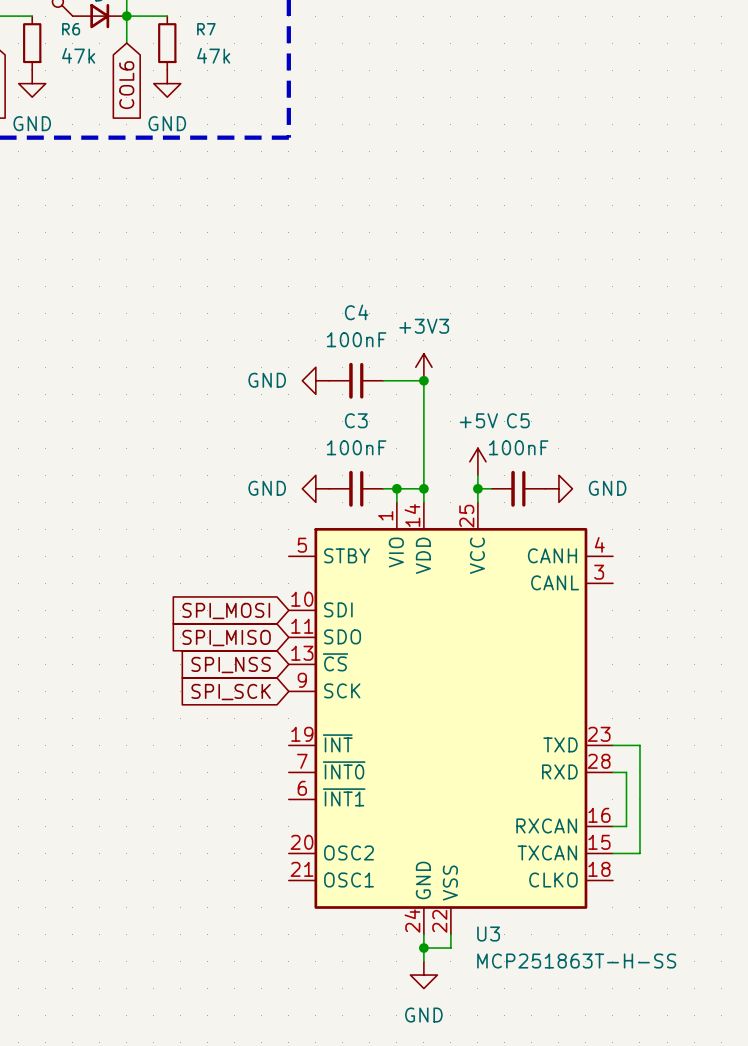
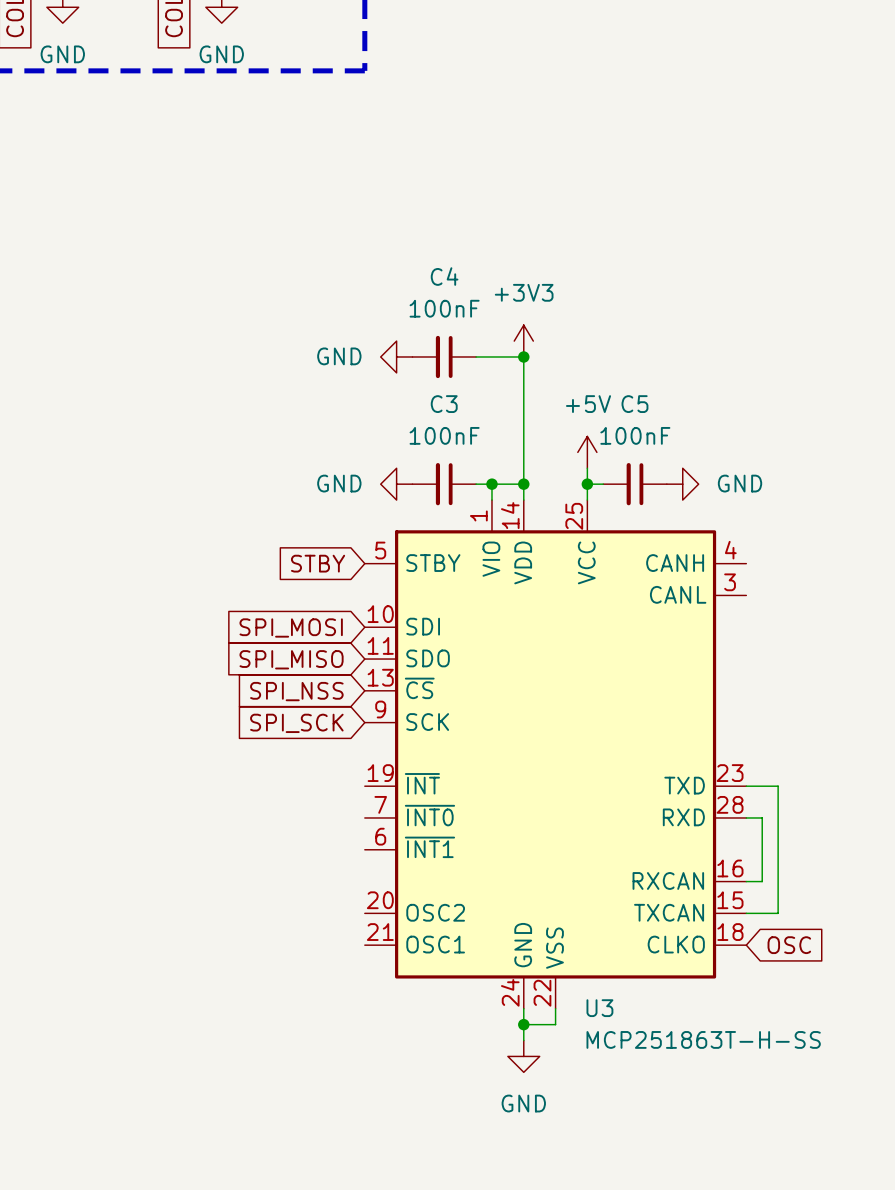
global label: none -> STBY (318, 563)
global label: none -> OSC (789, 945)

